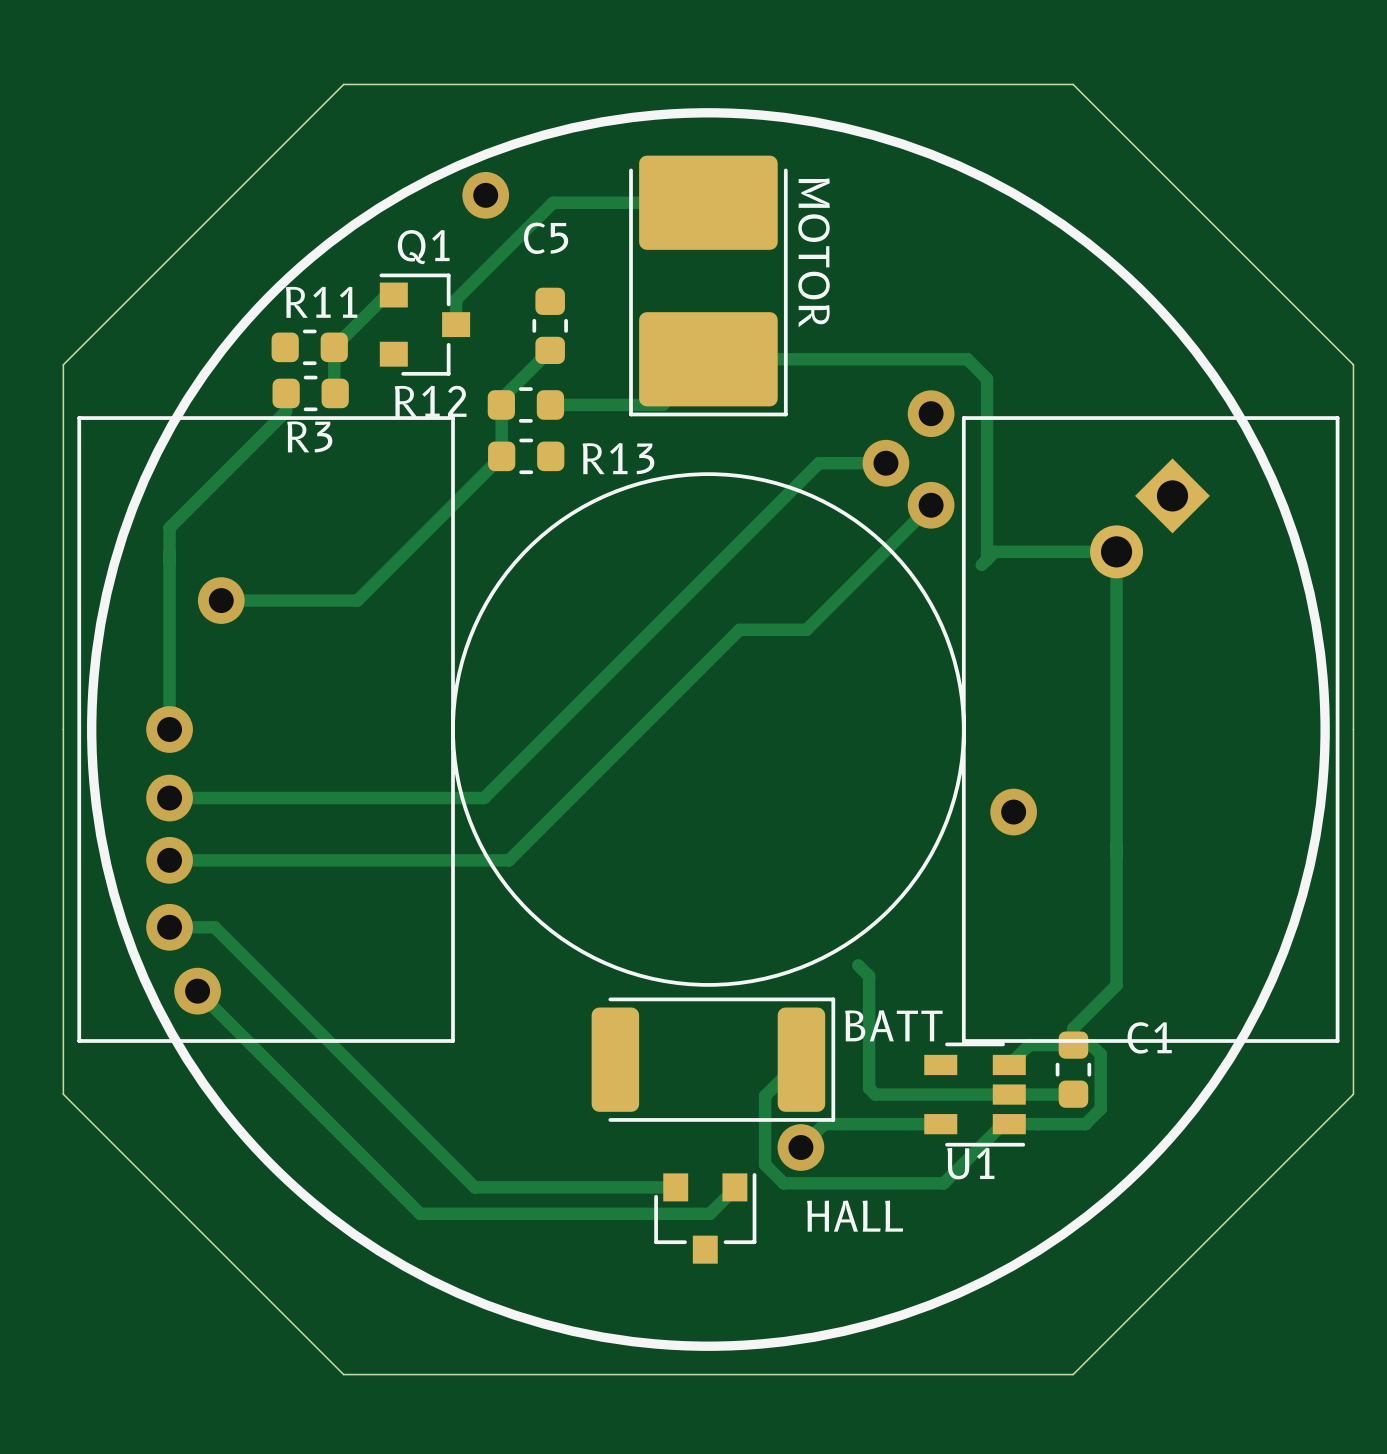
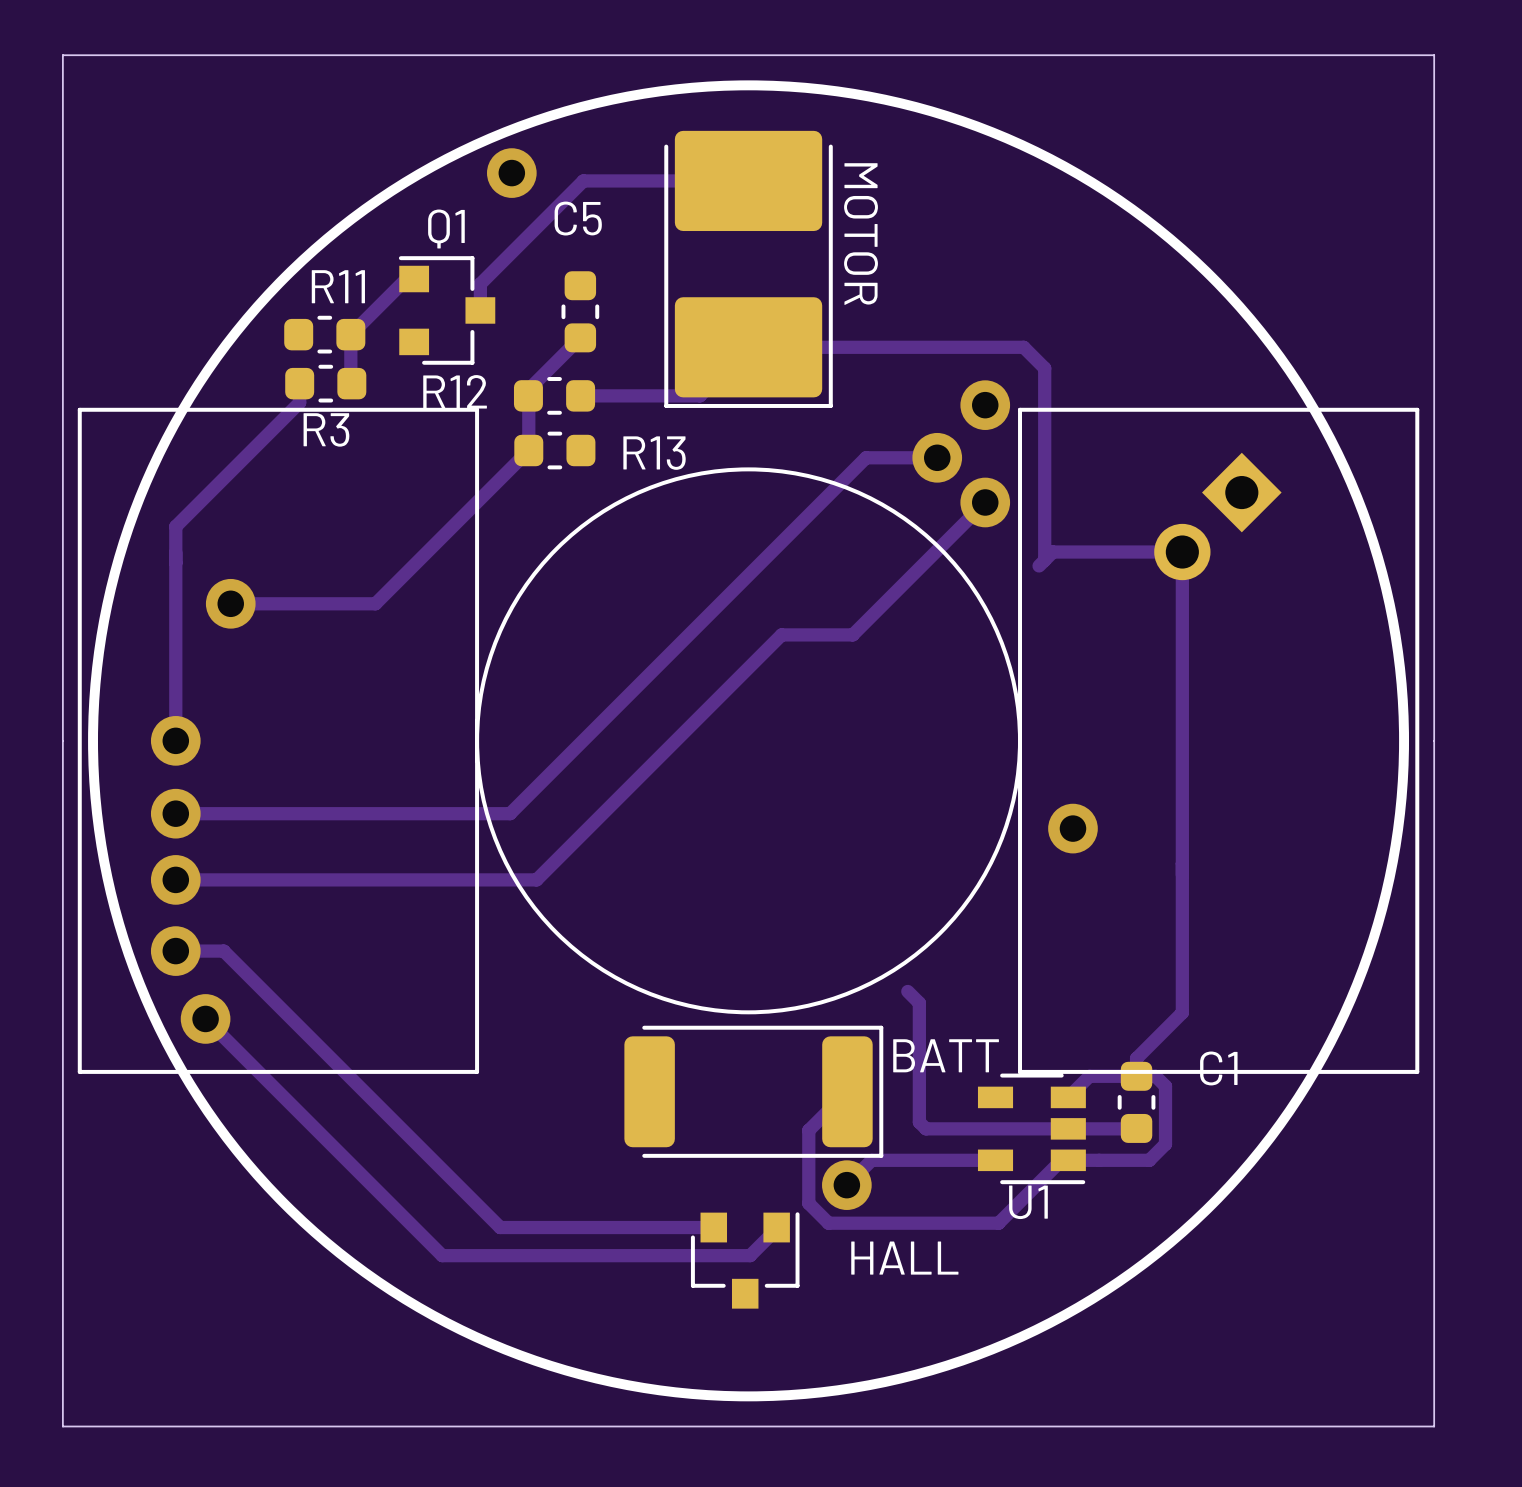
board edge: (343, 84) (63, 364) -> (360, 55) (62, 55) (62, 353)
board edge: (1073, 84) (1353, 364) -> (1136, 55) (1434, 55) (1434, 353)
board edge: (63, 1094) (343, 1374) -> (62, 1128) (62, 1426) (360, 1426)
board edge: (1353, 1094) (1073, 1374) -> (1434, 1128) (1434, 1426) (1136, 1426)

